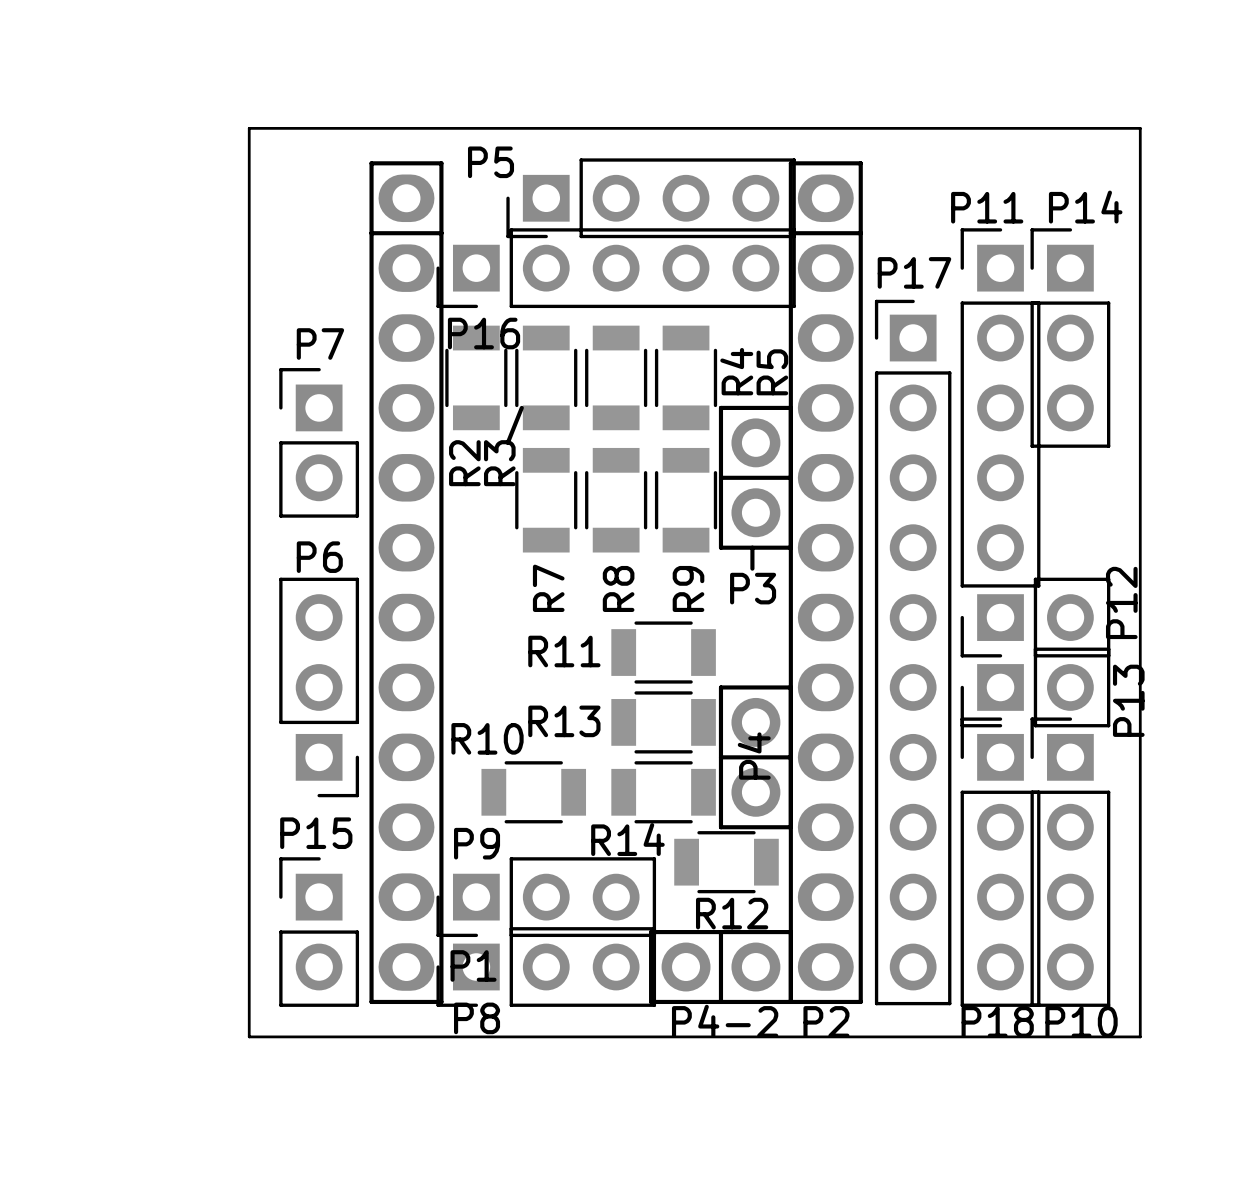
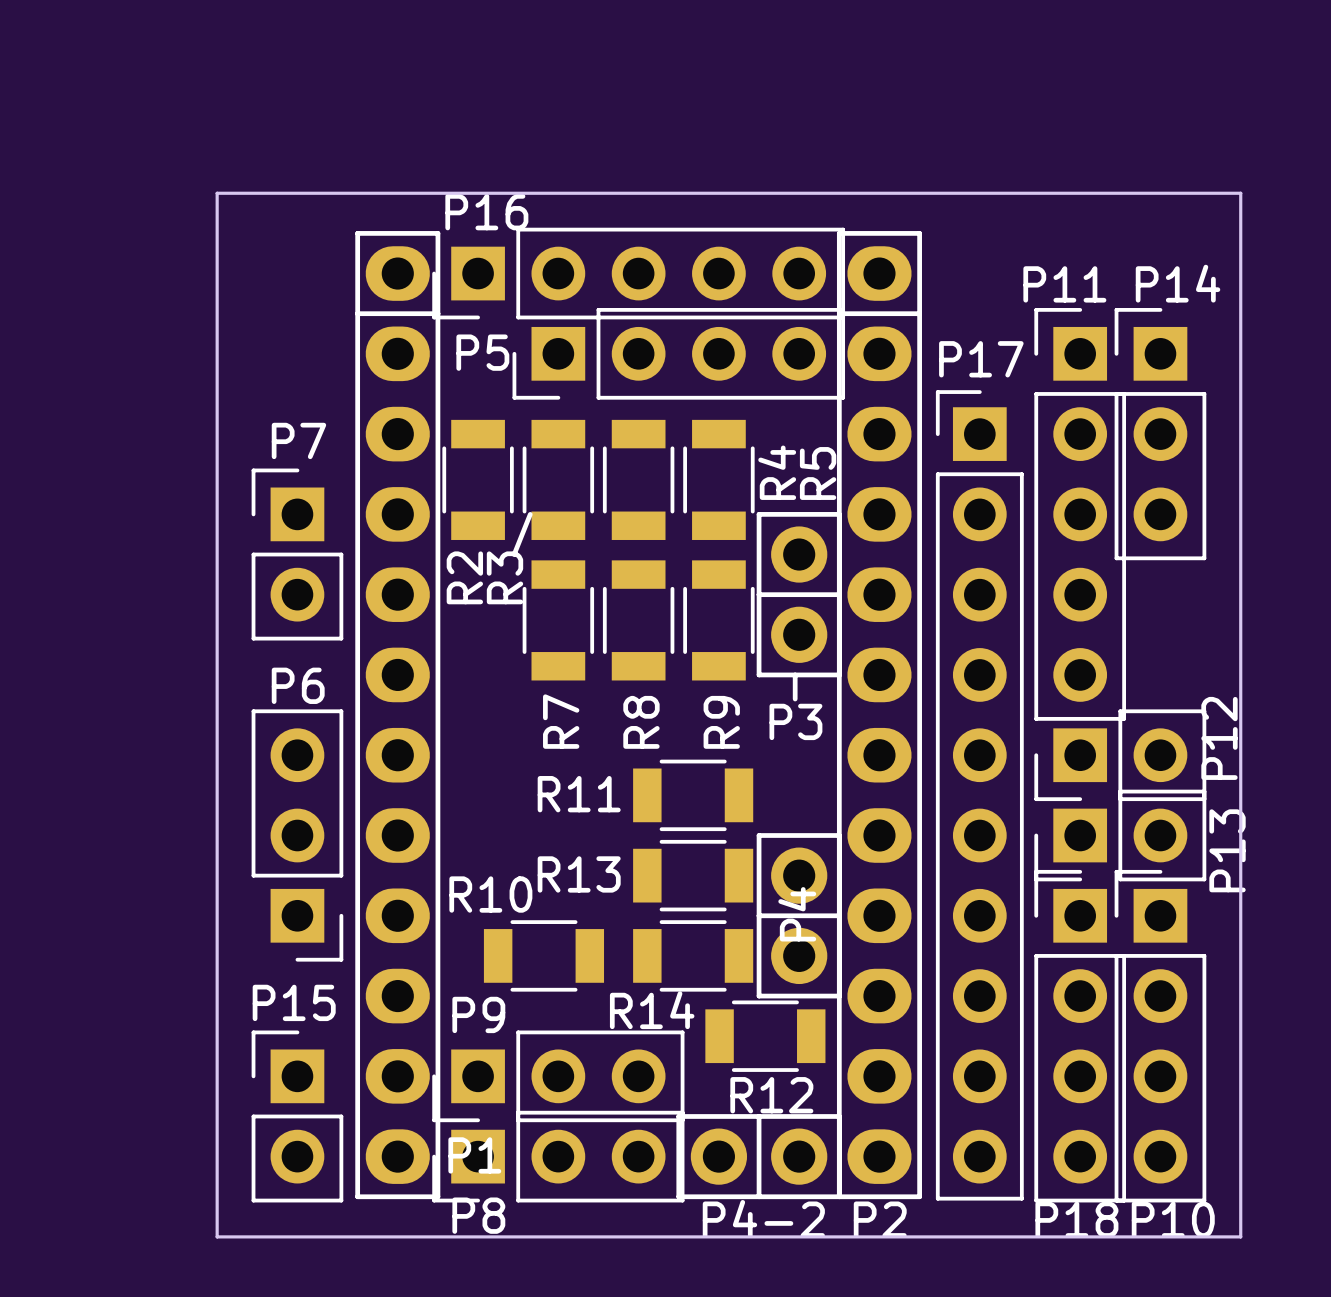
P5 name position: P5 (491, 162) -> P5 (482, 352)
P5 position: (651, 198) -> (678, 353)
P16 position: (616, 268) -> (638, 273)
P16 name position: P16 (484, 333) -> P16 (486, 212)

